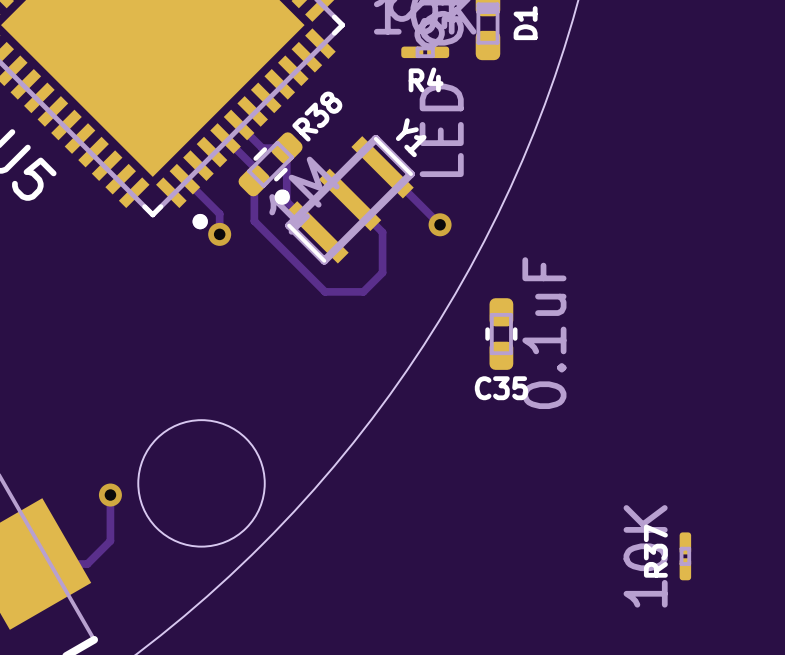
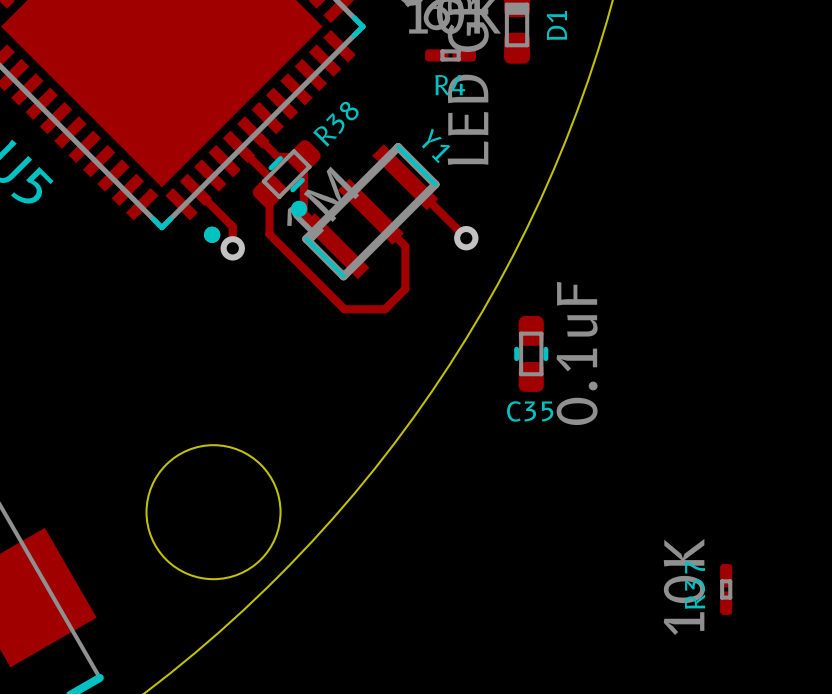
track: (110, 495) (110, 541) (87, 564) (26, 564) -> none
via: (110, 495) -> none

